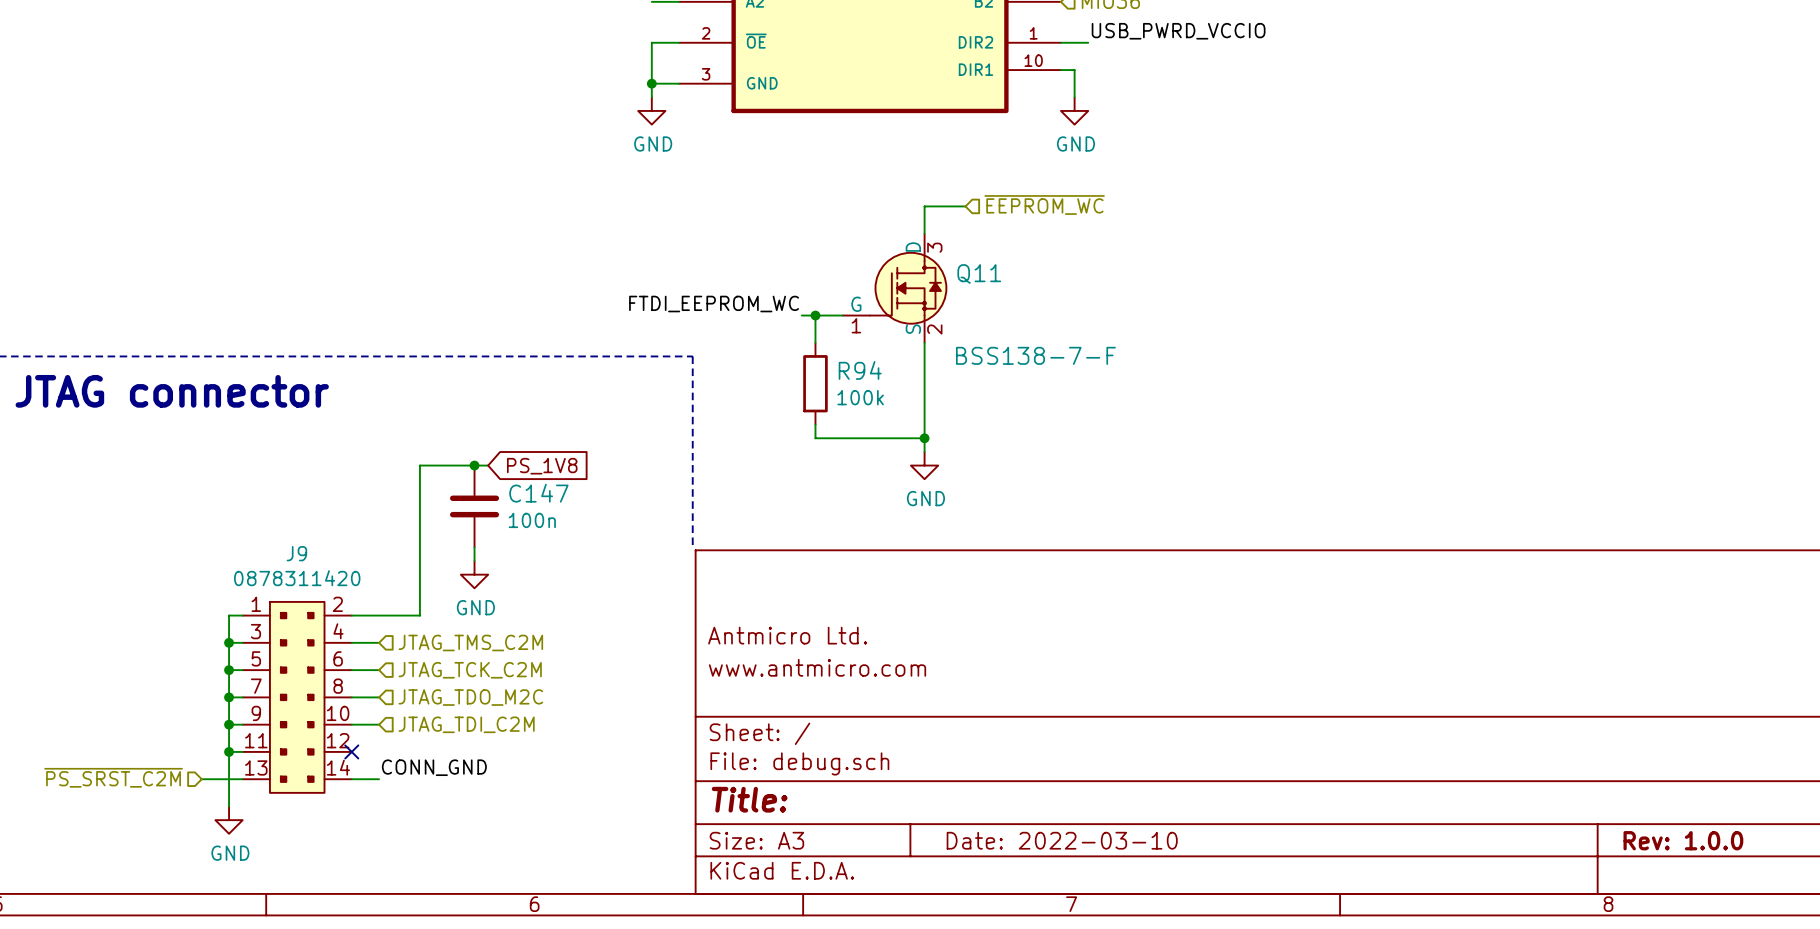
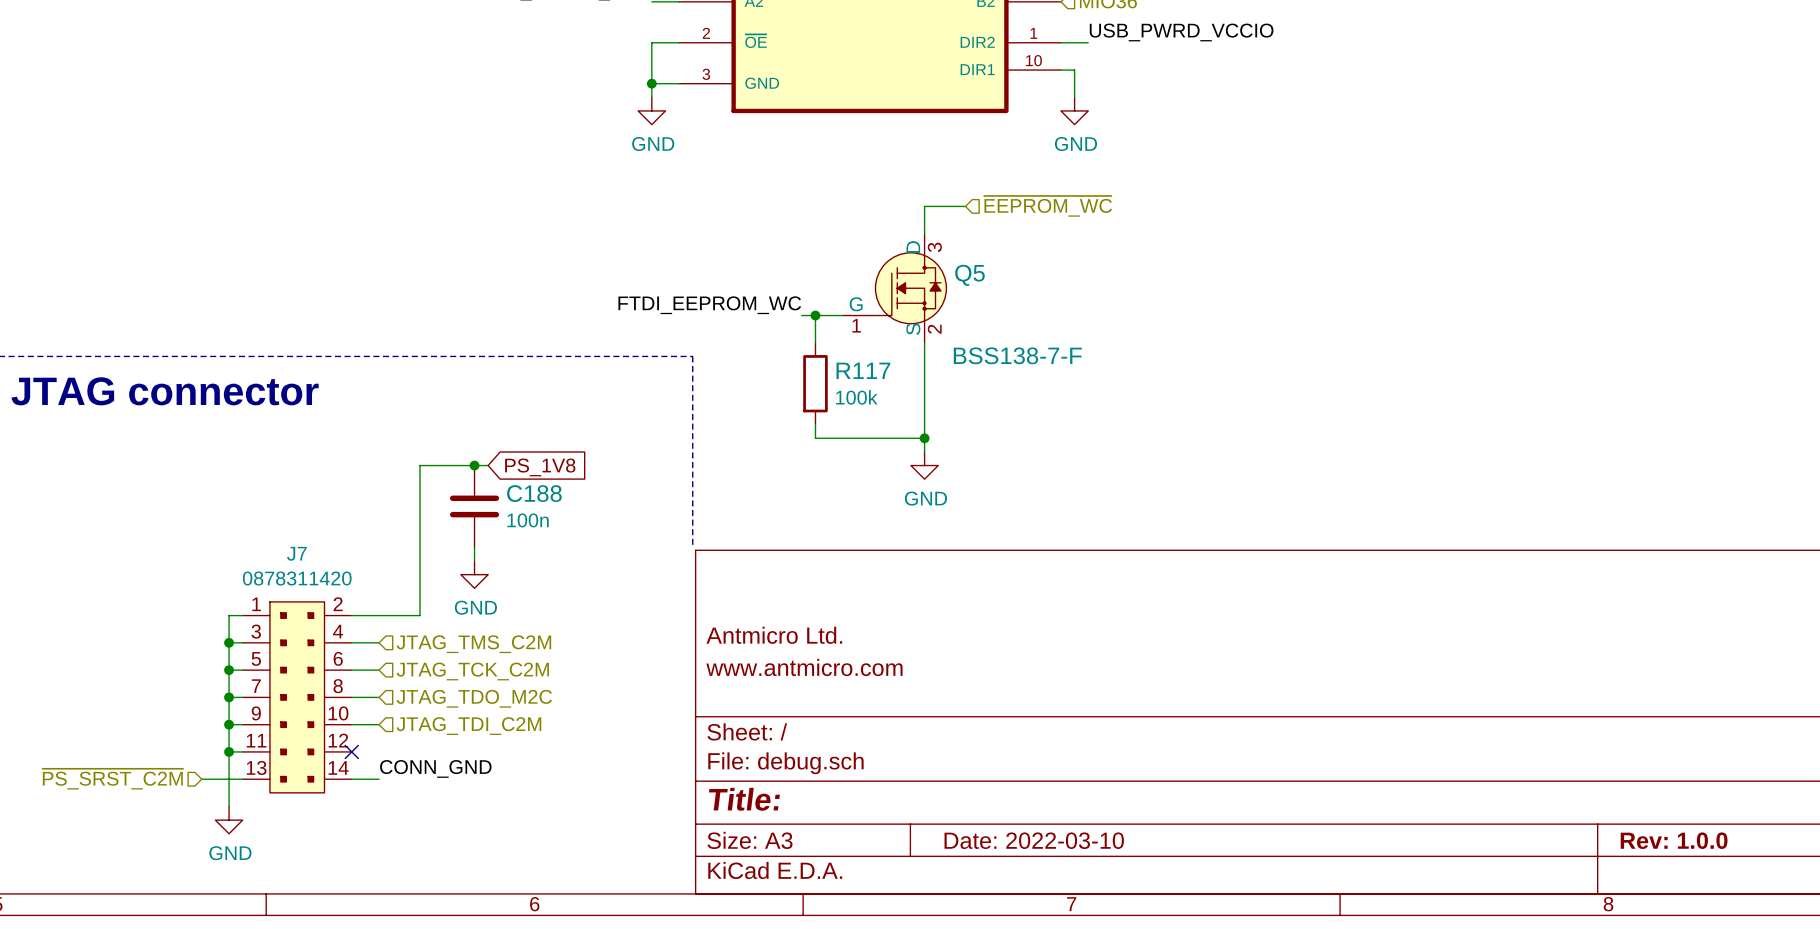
Q11 name: Q11 (979, 273) -> Q5 (969, 275)
R94 name: R94 (860, 370) -> R117 (863, 370)
C147 name: C147 (538, 493) -> C188 (534, 493)
J9 name: J9 (296, 553) -> J7 (296, 553)

